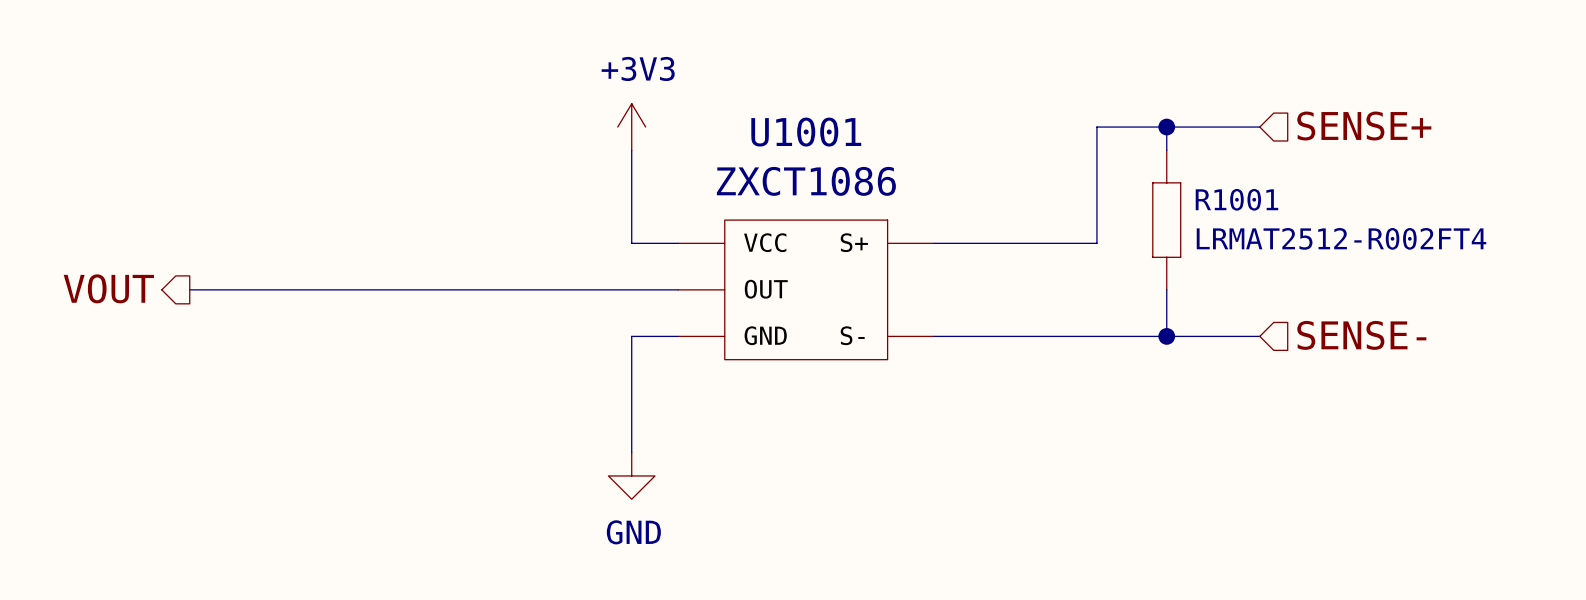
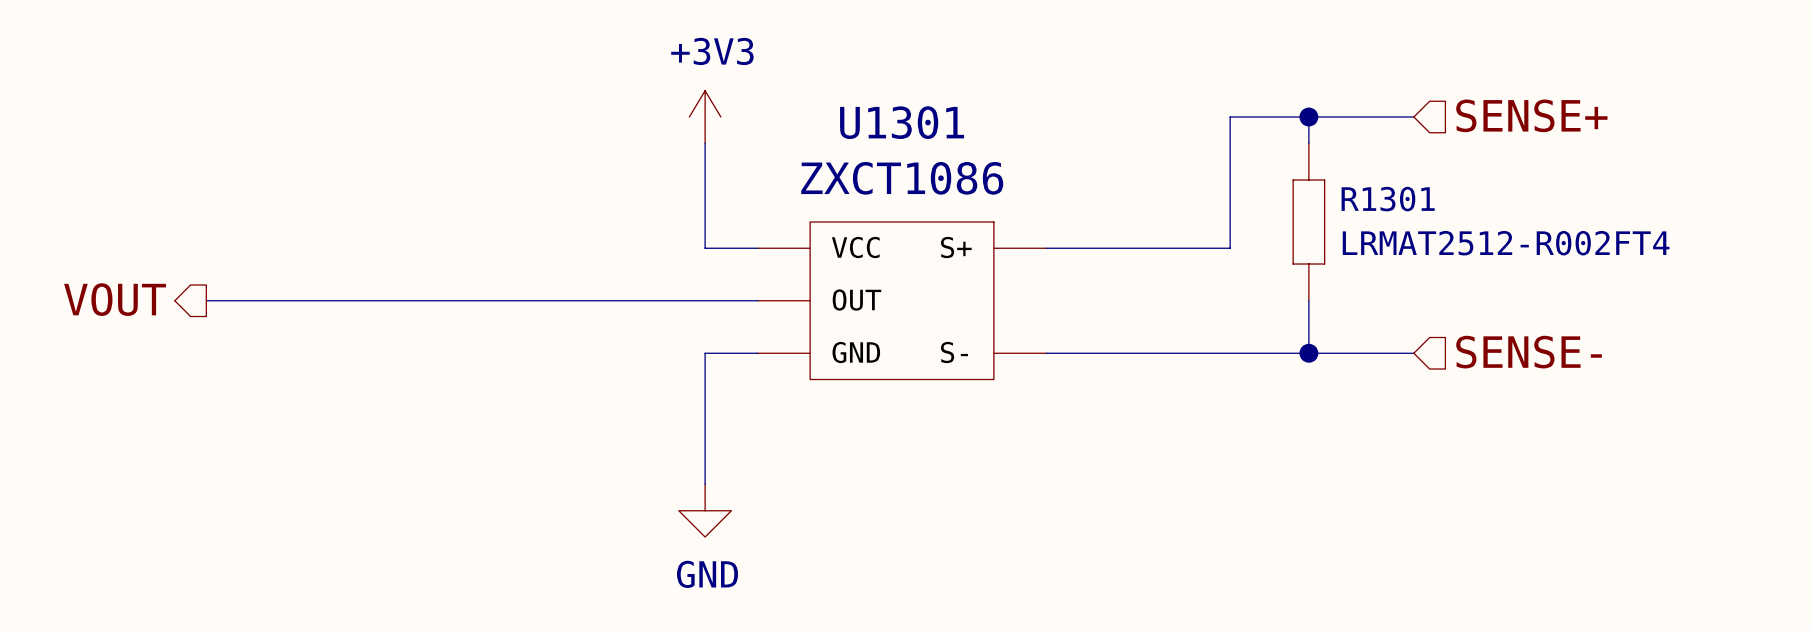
U1001 name: U1001 (806, 132) -> U1301 (902, 122)
R1001 name: R1001 (1236, 199) -> R1301 (1388, 199)

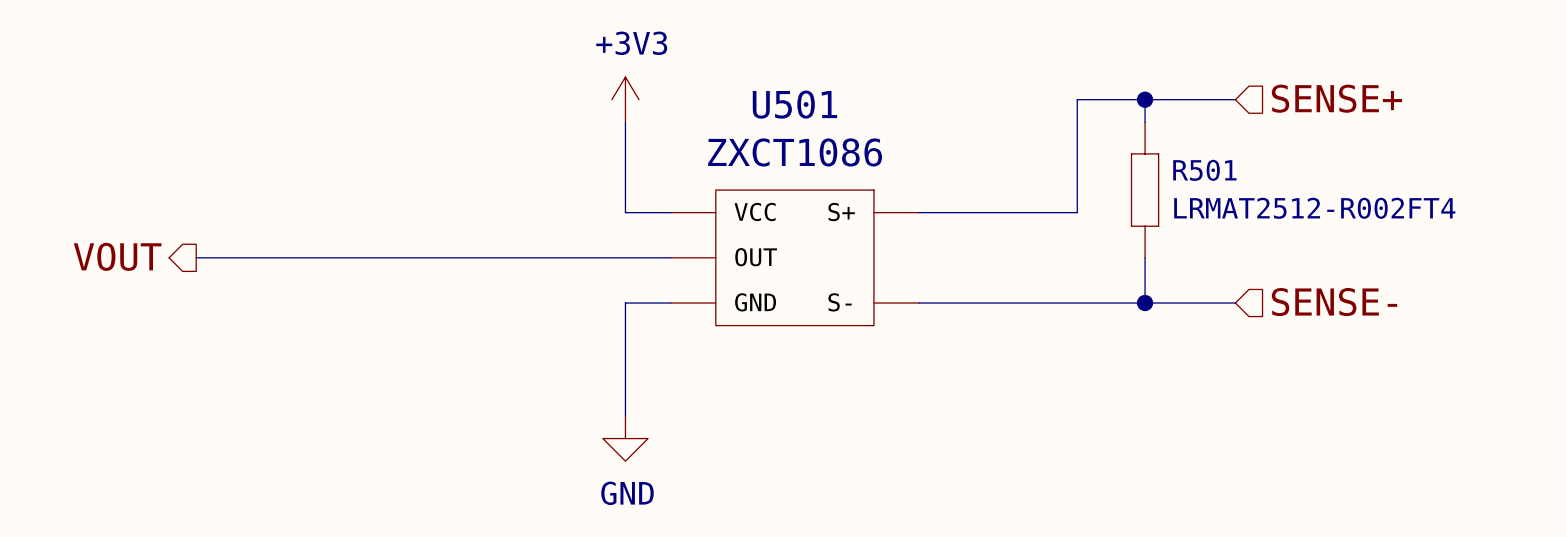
U1301 name: U1301 (902, 122) -> U501 (794, 104)
R1301 name: R1301 (1388, 199) -> R501 (1204, 170)

